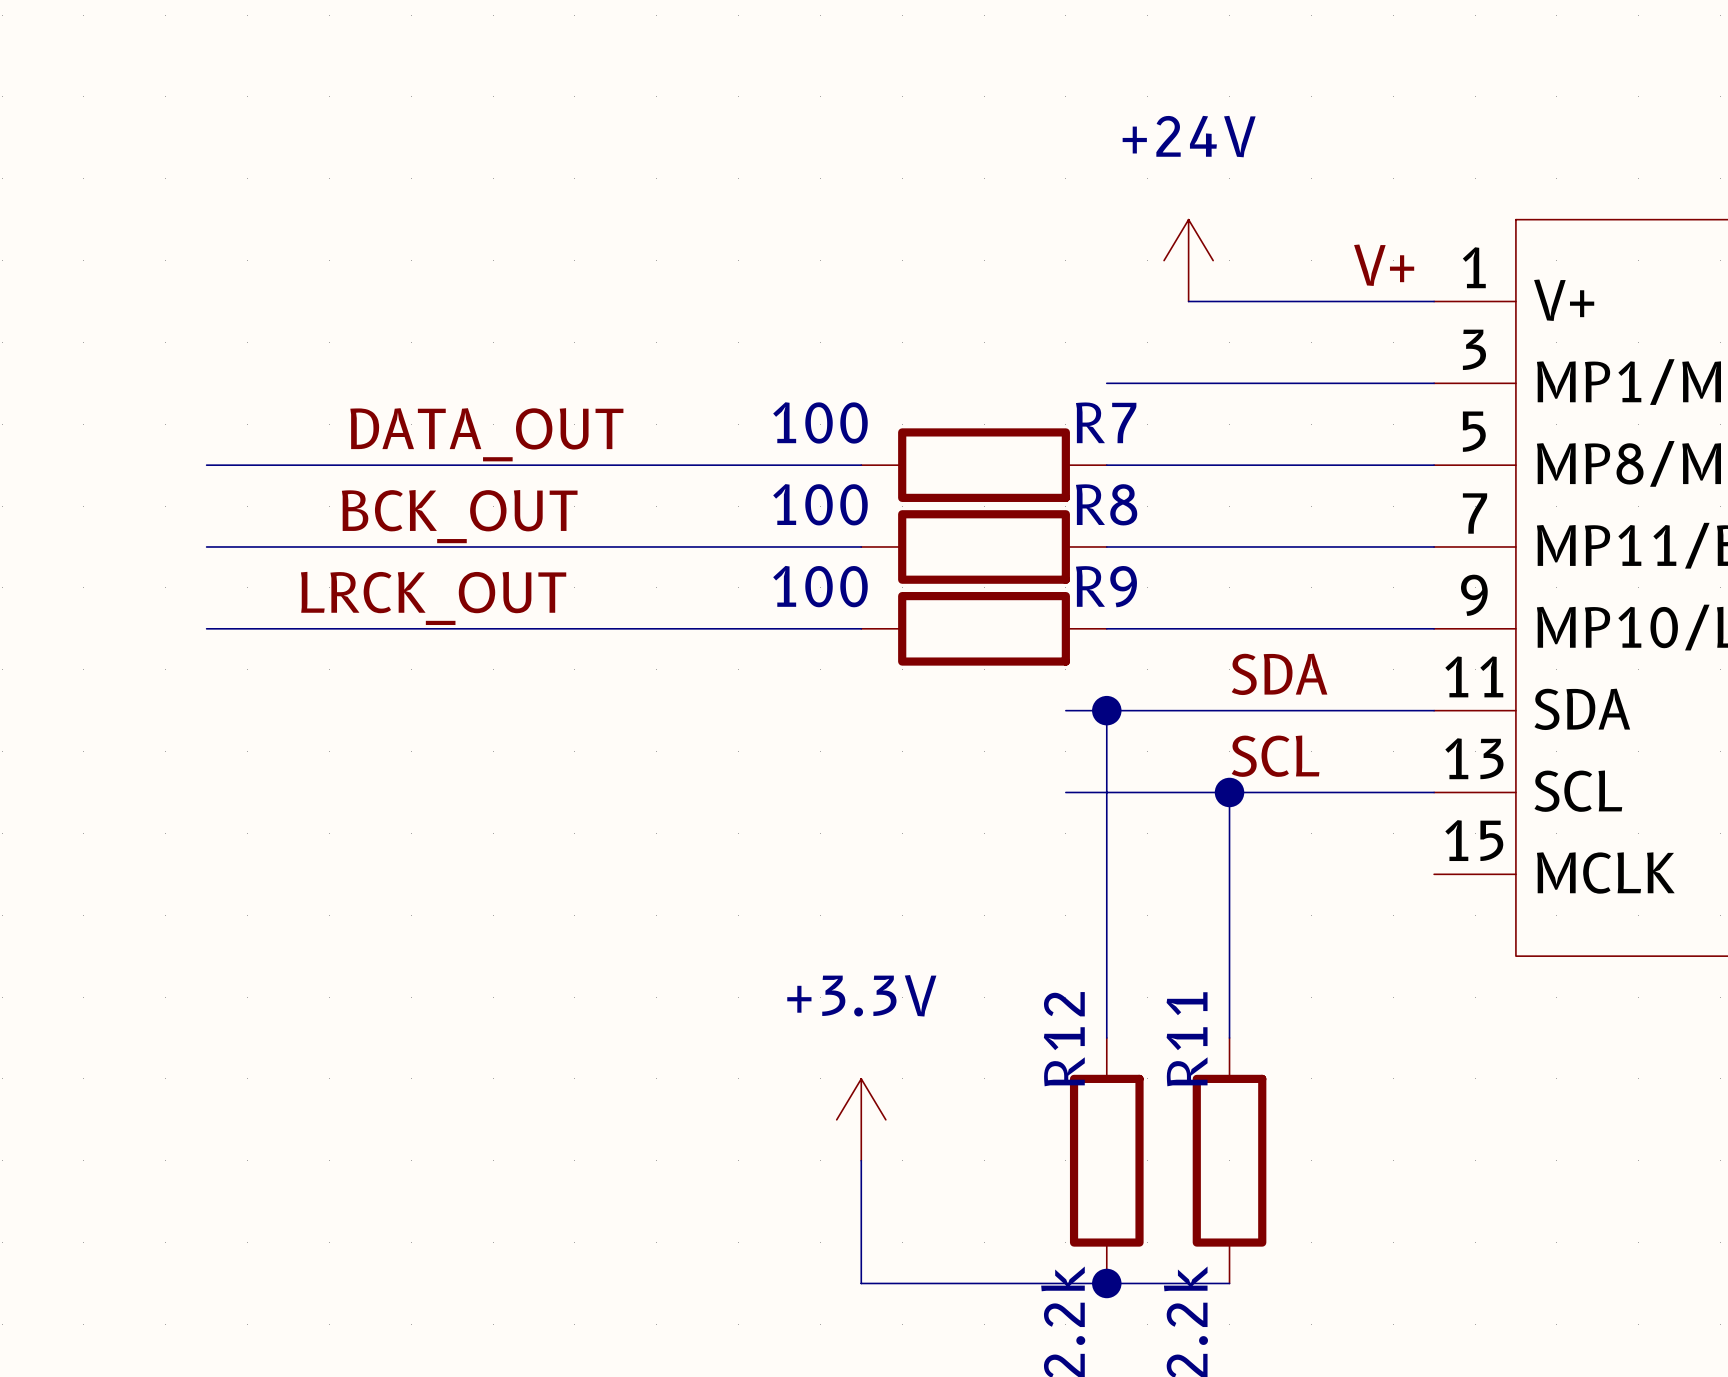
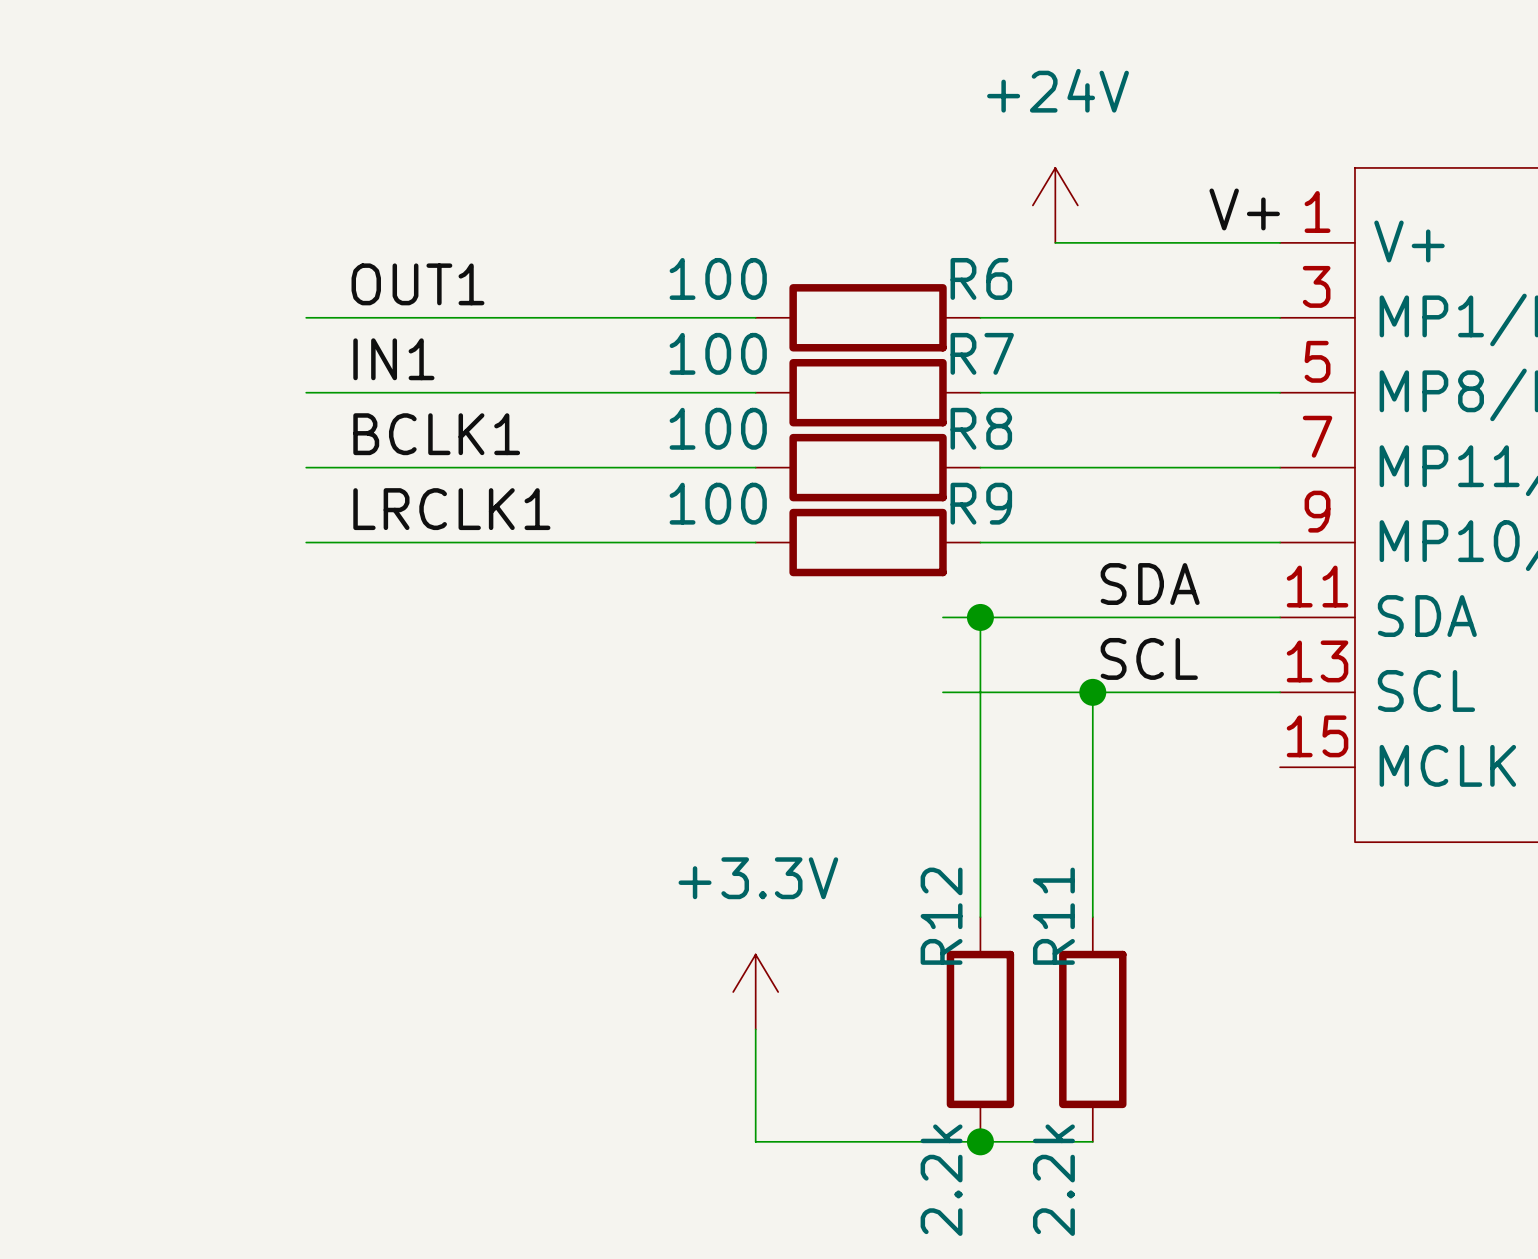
label: none -> OUT1 (417, 284)
wire: none -> (306, 317) (755, 317)
R6: none -> 100 (868, 317)
label: none -> IN1 (393, 359)
label: DATA_OUT (486, 434) -> none
wire: (206, 465) (370, 465) -> none
label: none -> BCLK1 (436, 434)
label: BCK_OUT (459, 516) -> none
wire: (206, 546) (370, 546) -> none
label: none -> LRCLK1 (451, 509)
label: LRCK_OUT (433, 598) -> none
wire: (206, 628) (370, 628) -> none

